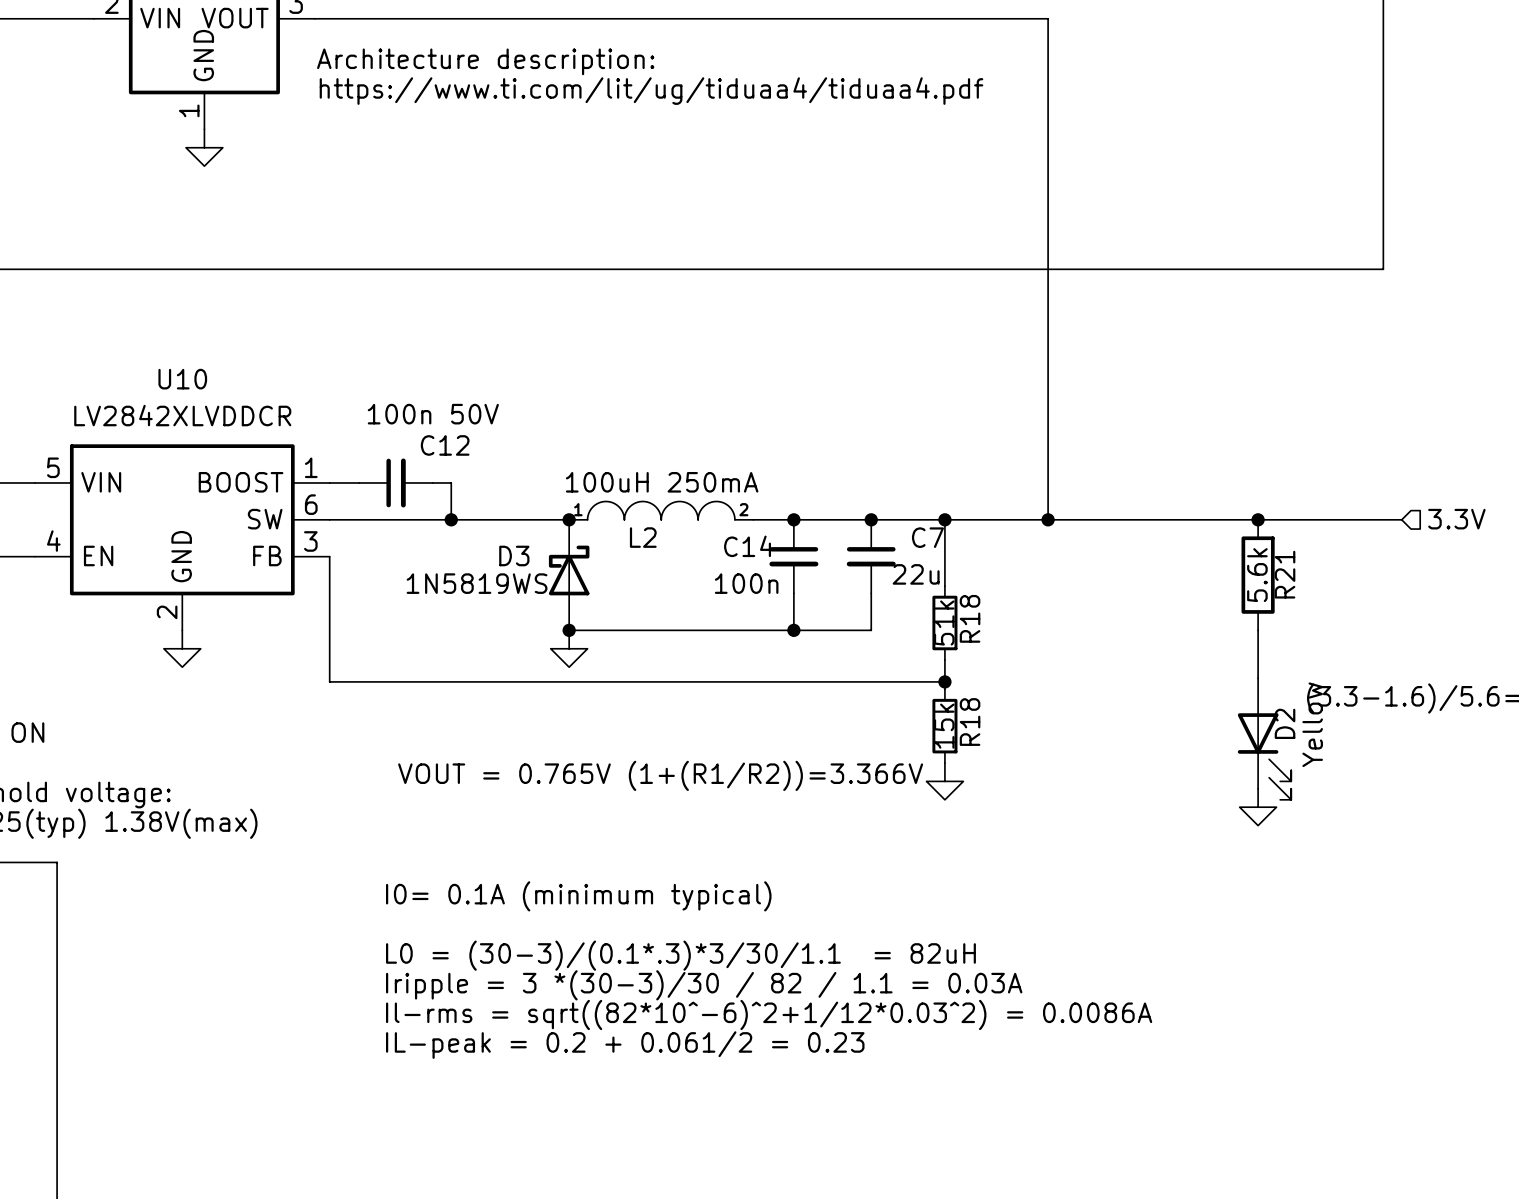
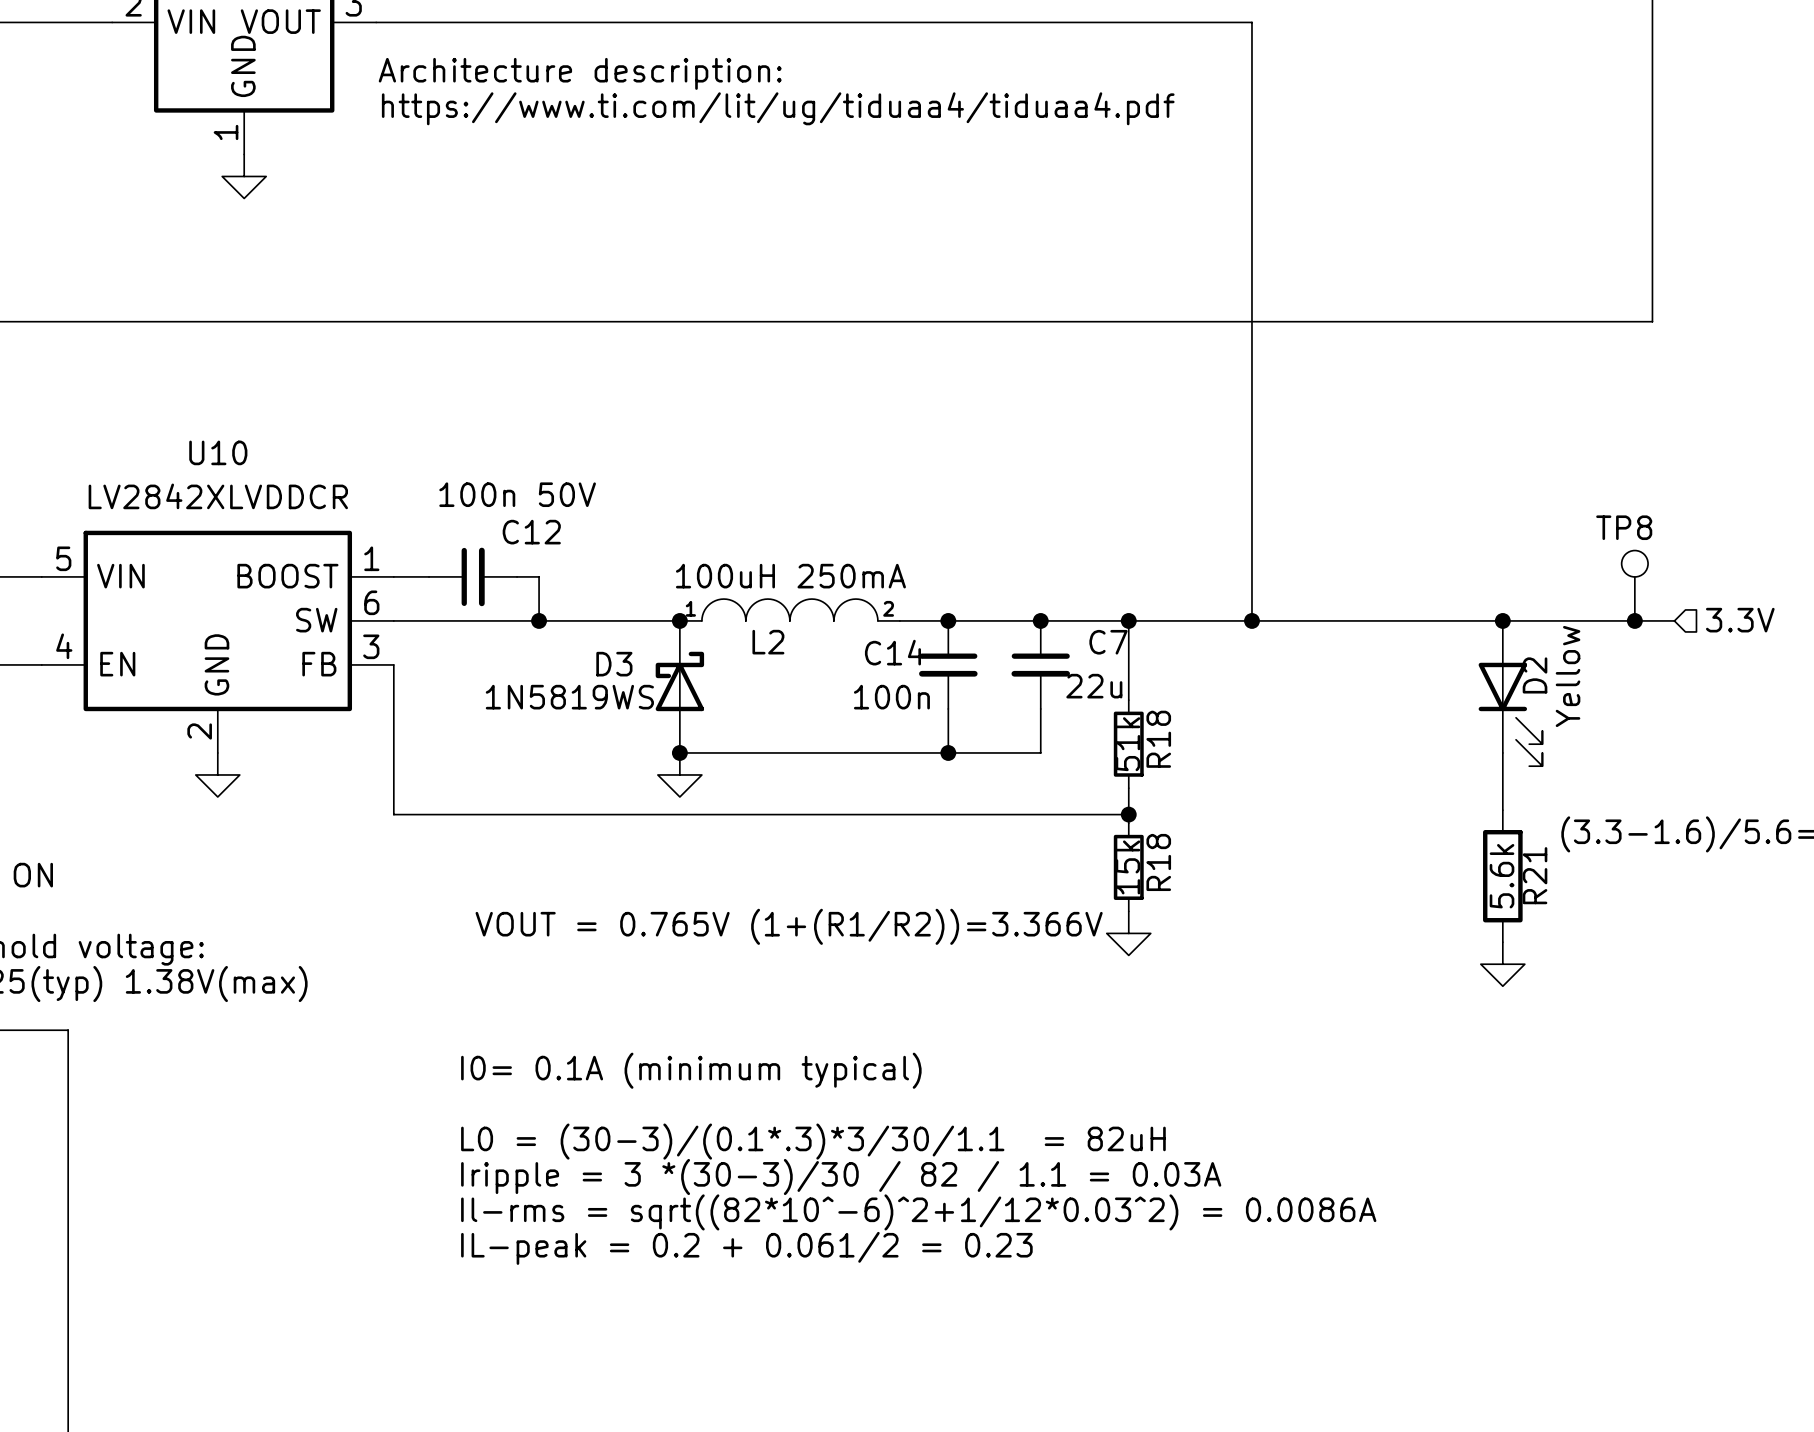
TP8: none -> (1634, 585)
junction: none -> (1634, 620)
R21 position: (1258, 575) -> (1502, 876)
D2 position: (1264, 739) -> (1510, 693)

